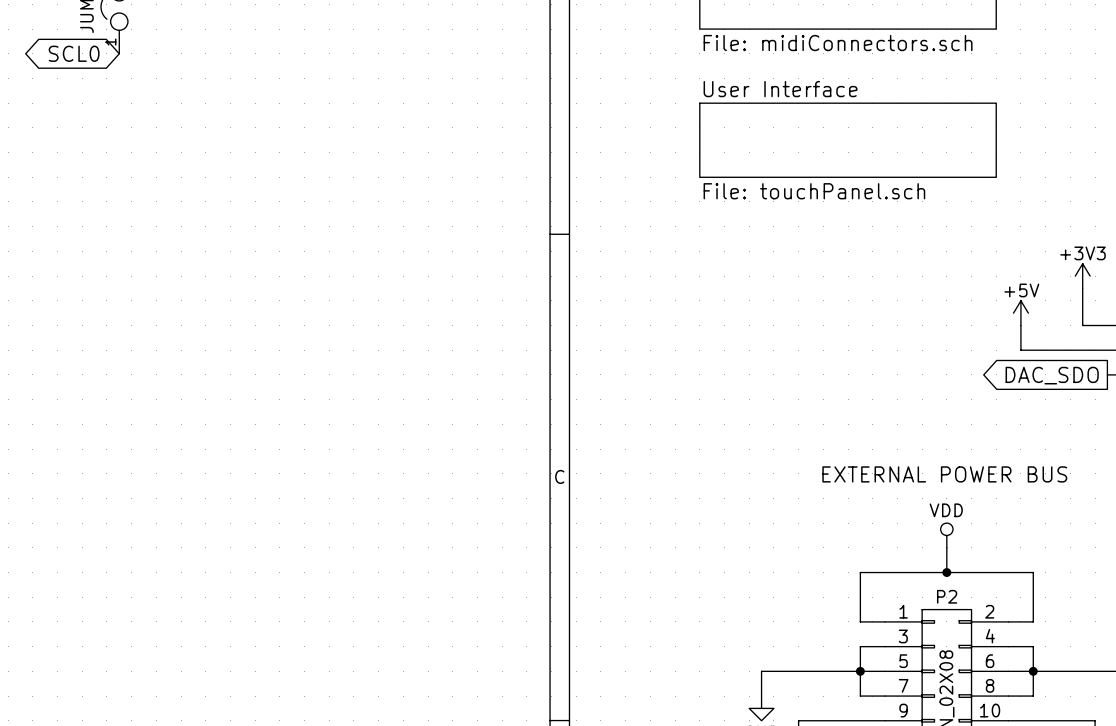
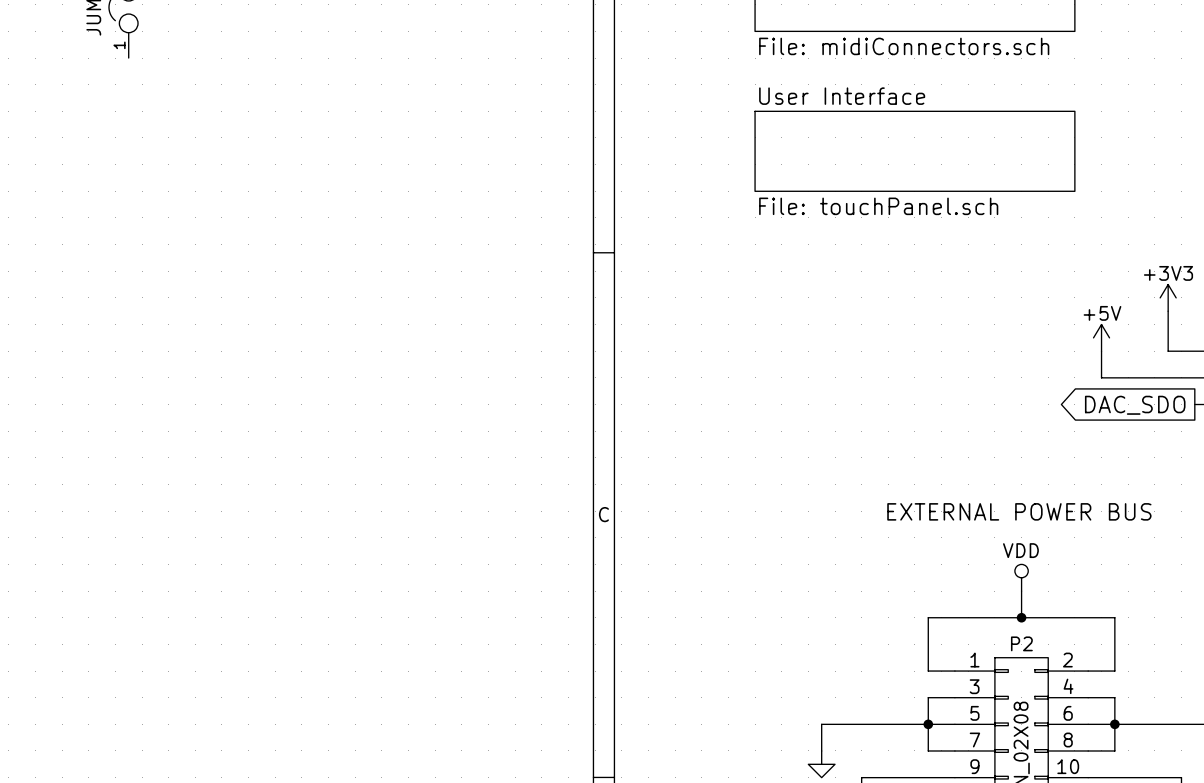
global label: SCL0 (74, 53) -> none

